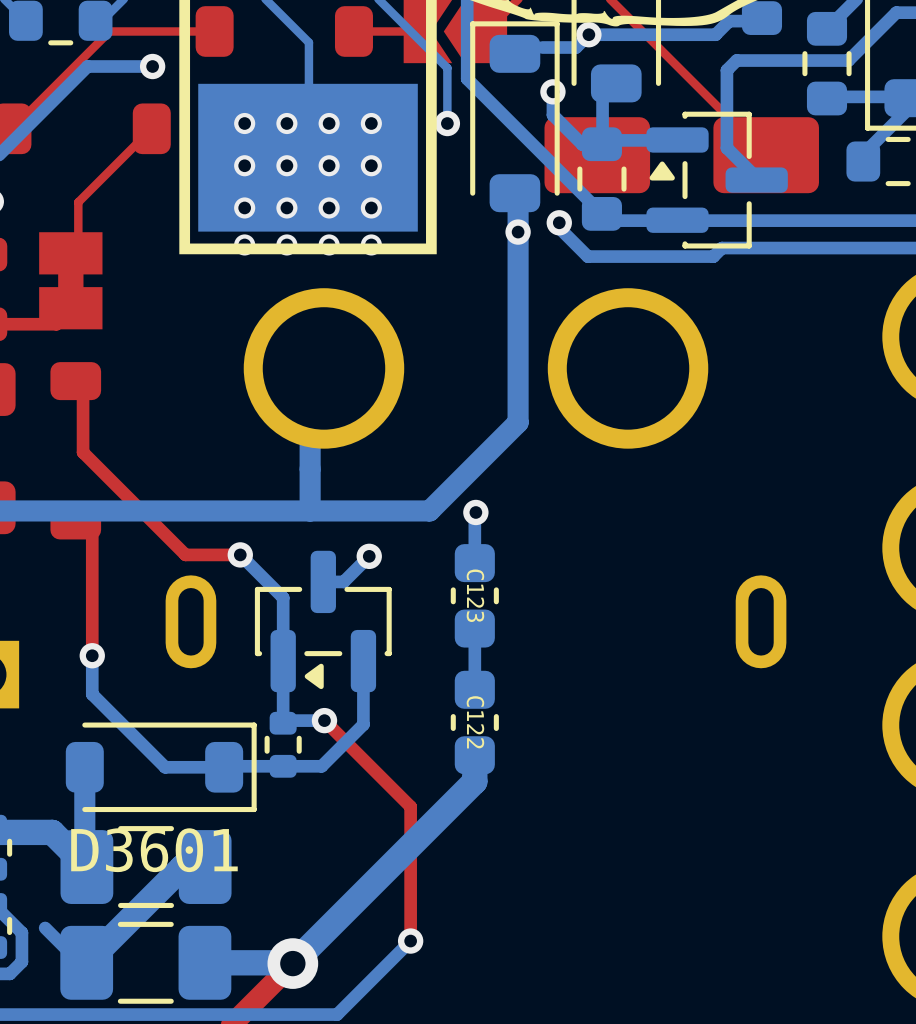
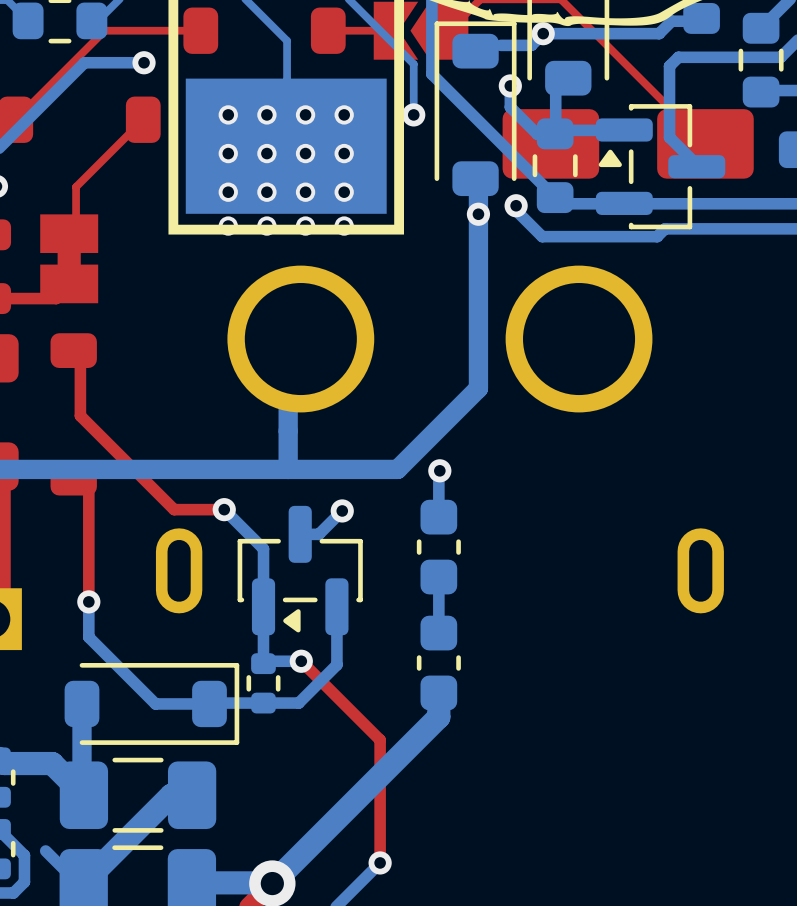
C123 name: C123 (475, 595) -> none
C122 name: C122 (475, 722) -> none
D3601 name: D3601 (154, 850) -> none

